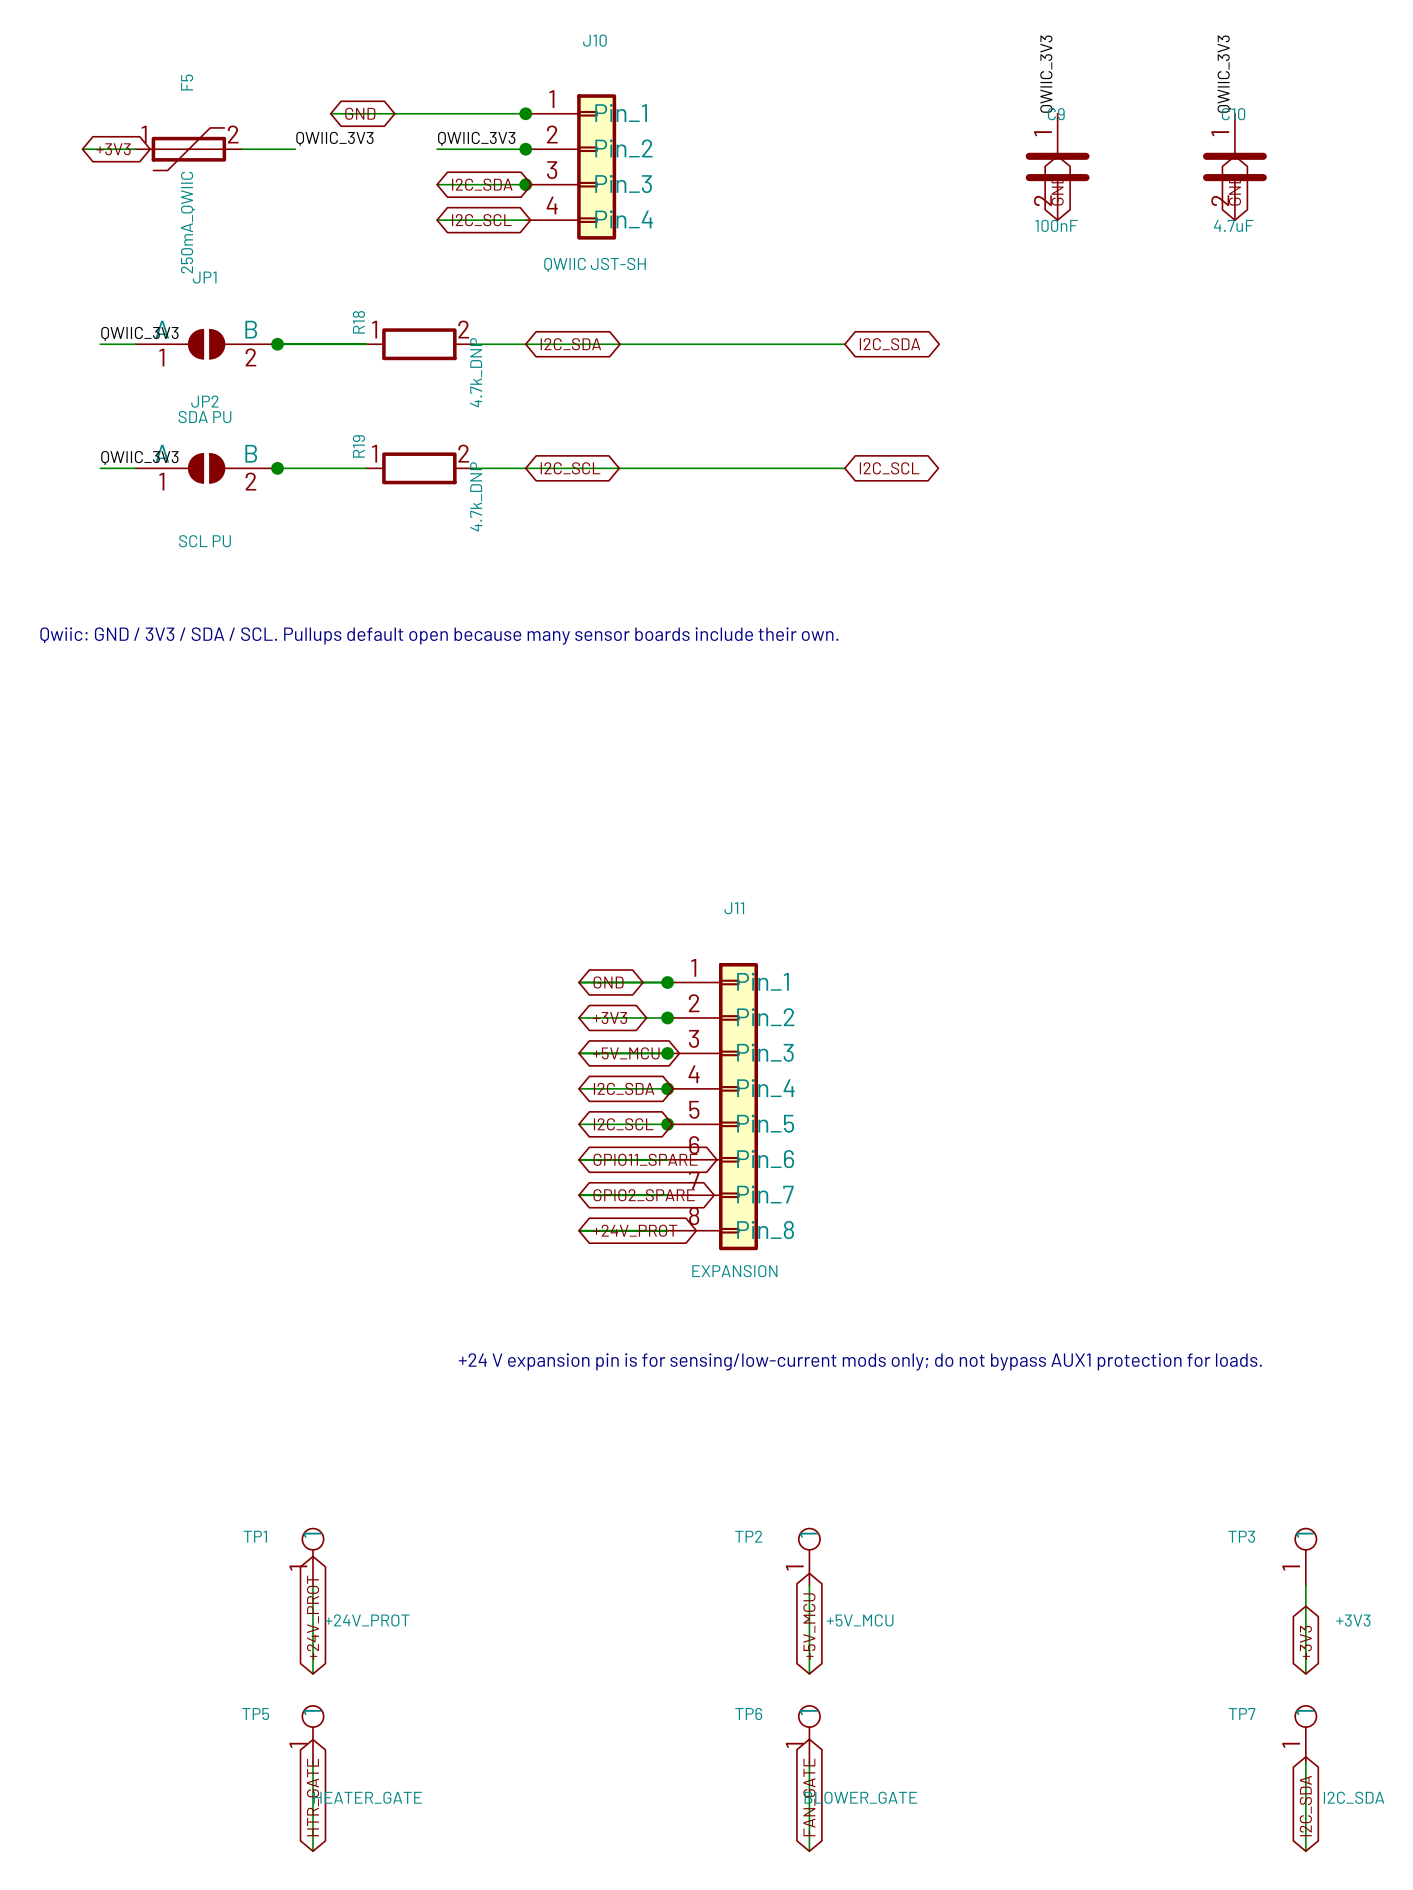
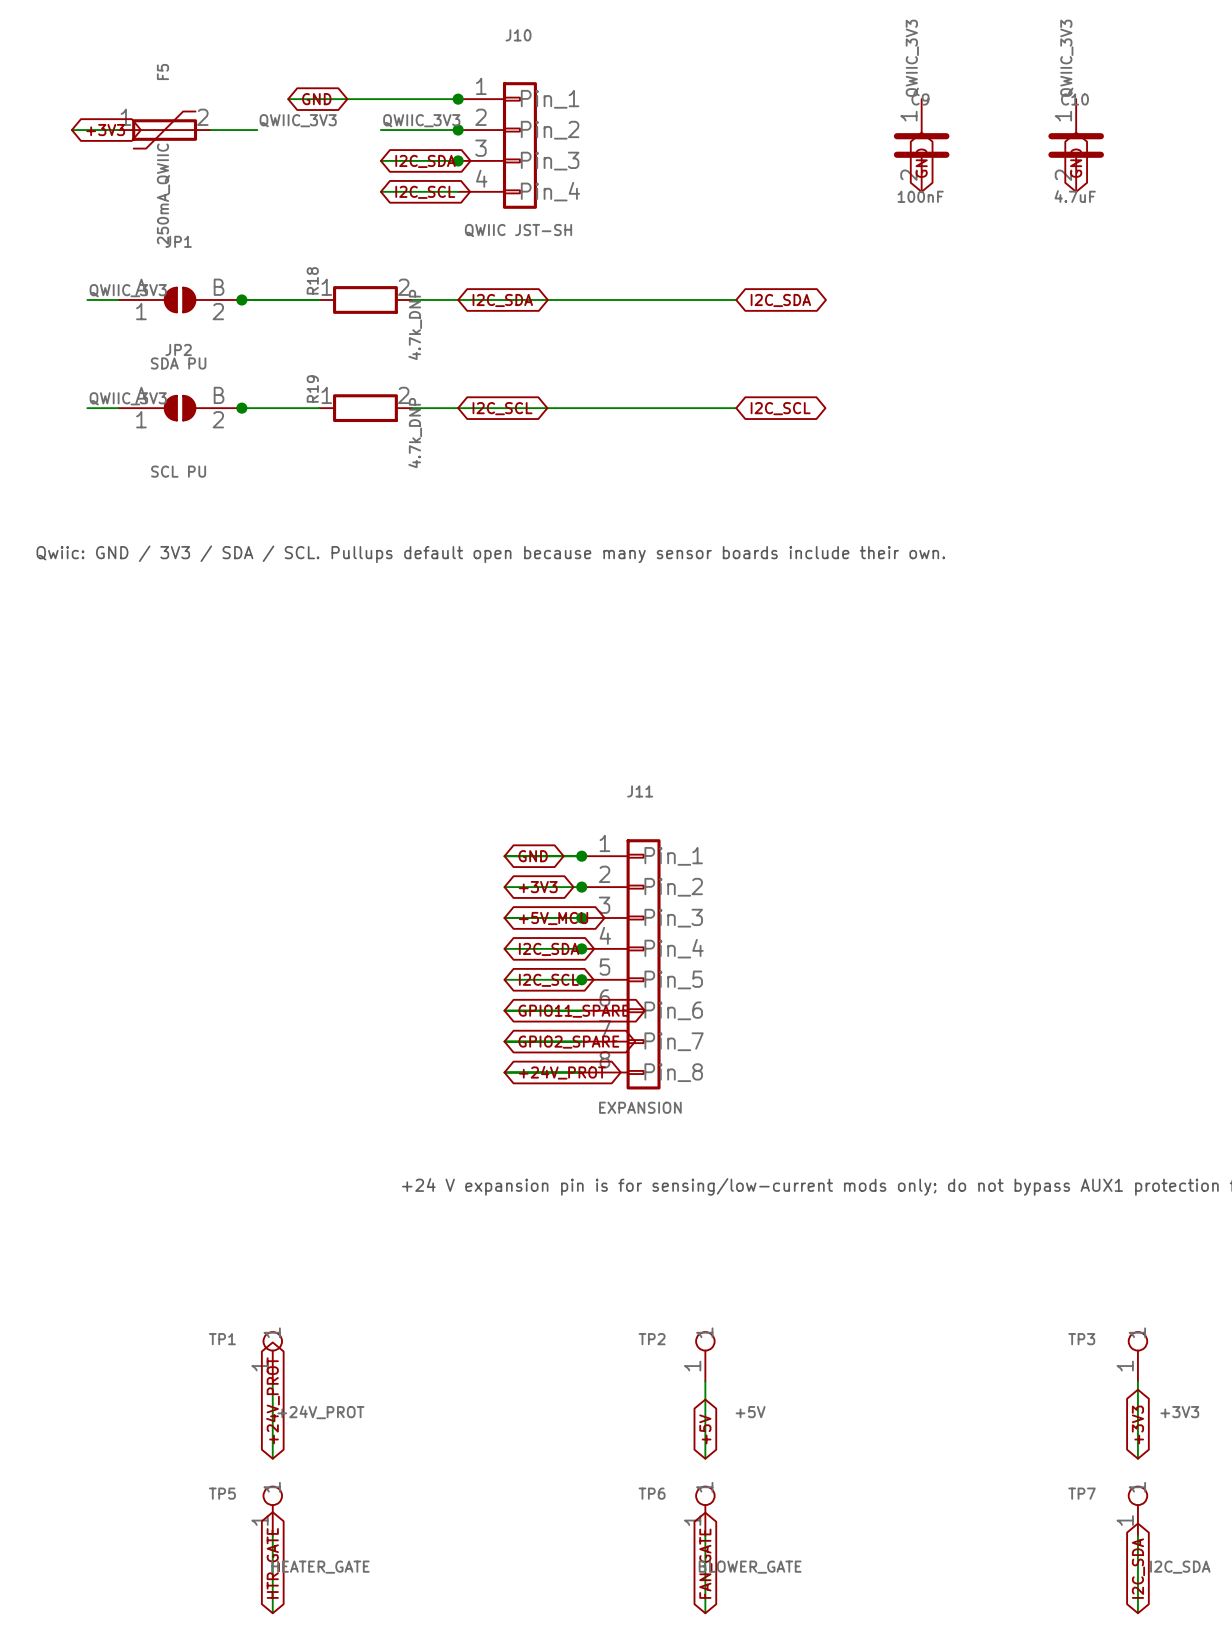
TP2 value: +5V_MCU (860, 1620) -> +5V (750, 1412)
global label: +5V_MCU (809, 1626) -> +5V (705, 1429)

